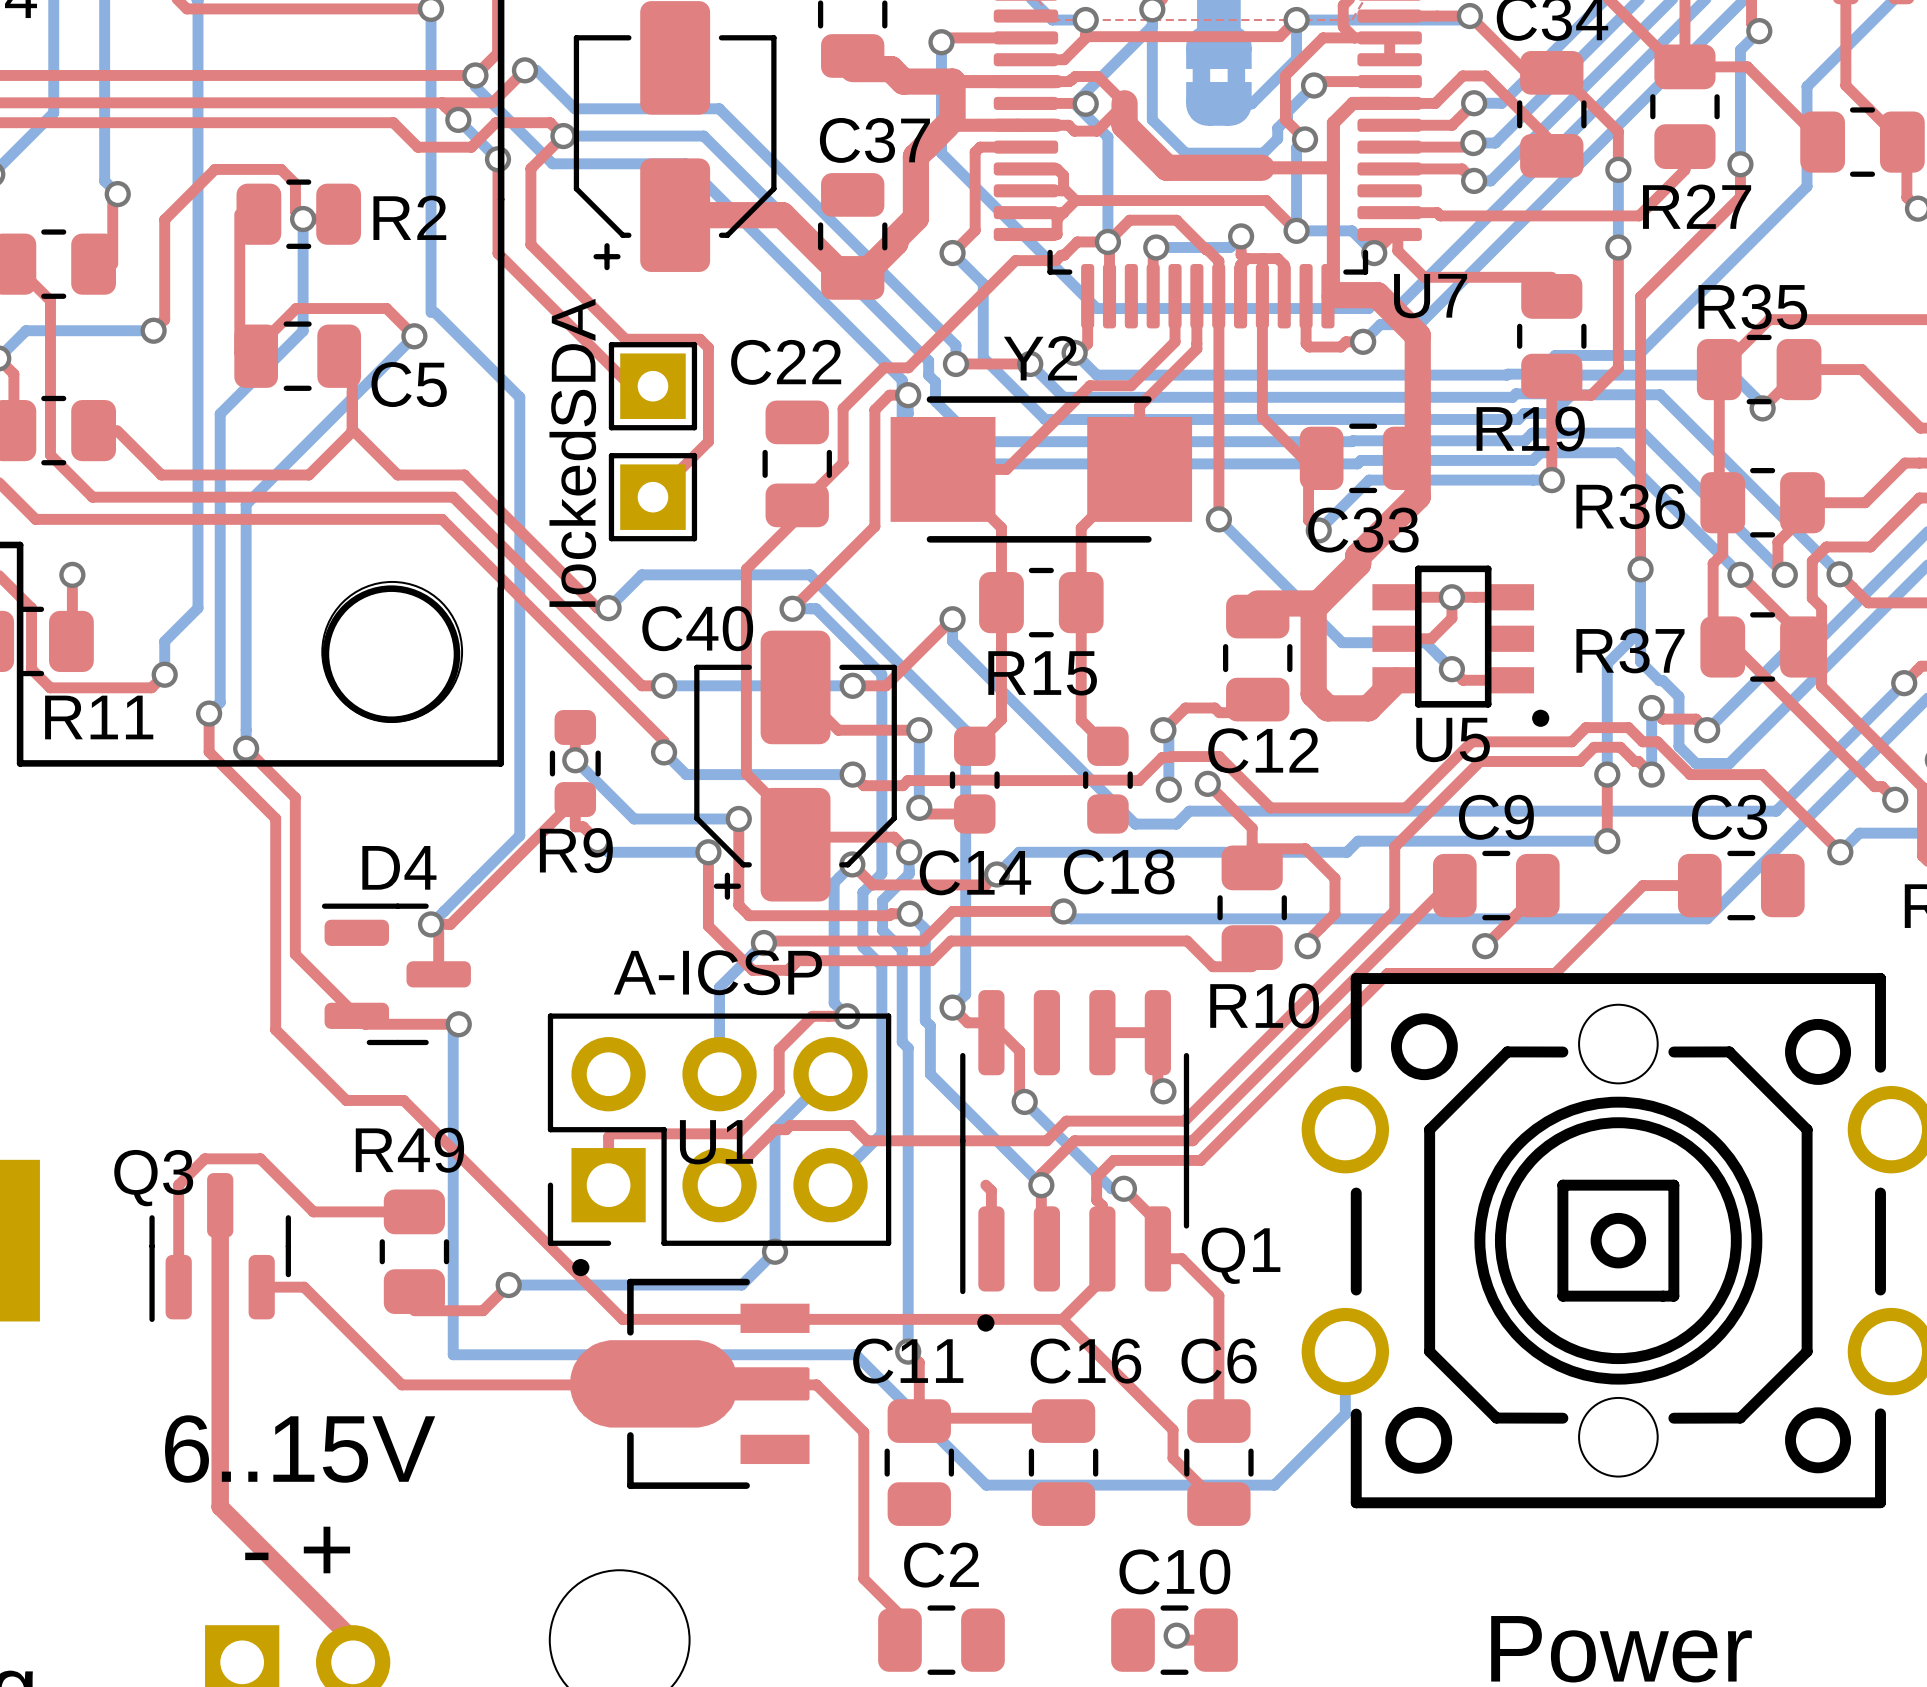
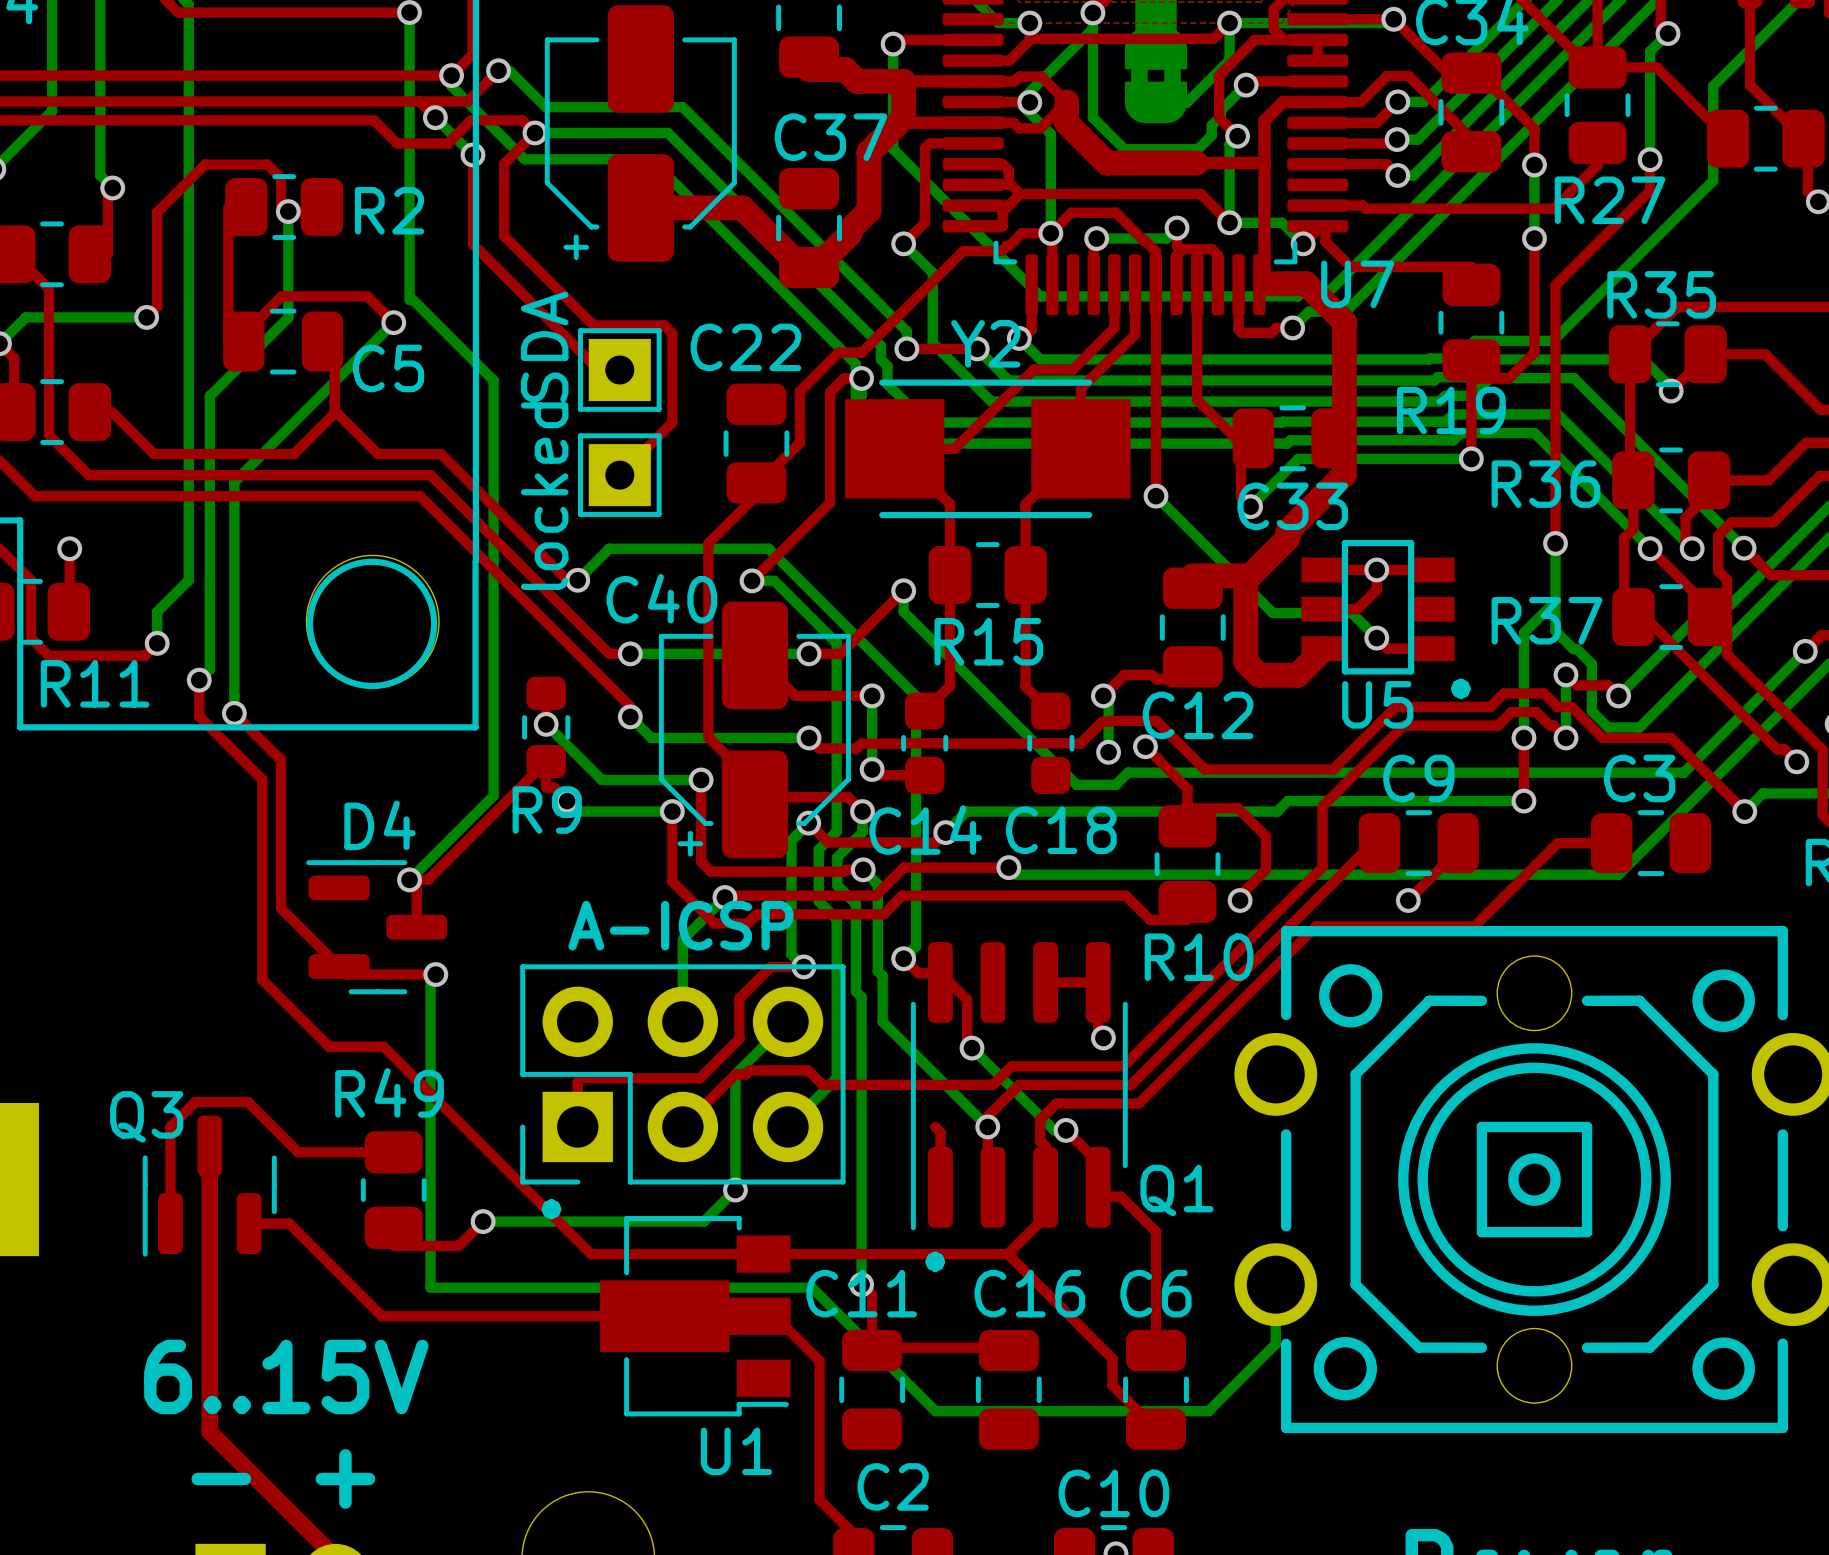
U1 name position: U1 (716, 1142) -> U1 (736, 1451)
U1 footprint: [570, 1278, 810, 1489] -> [600, 1216, 791, 1417]

